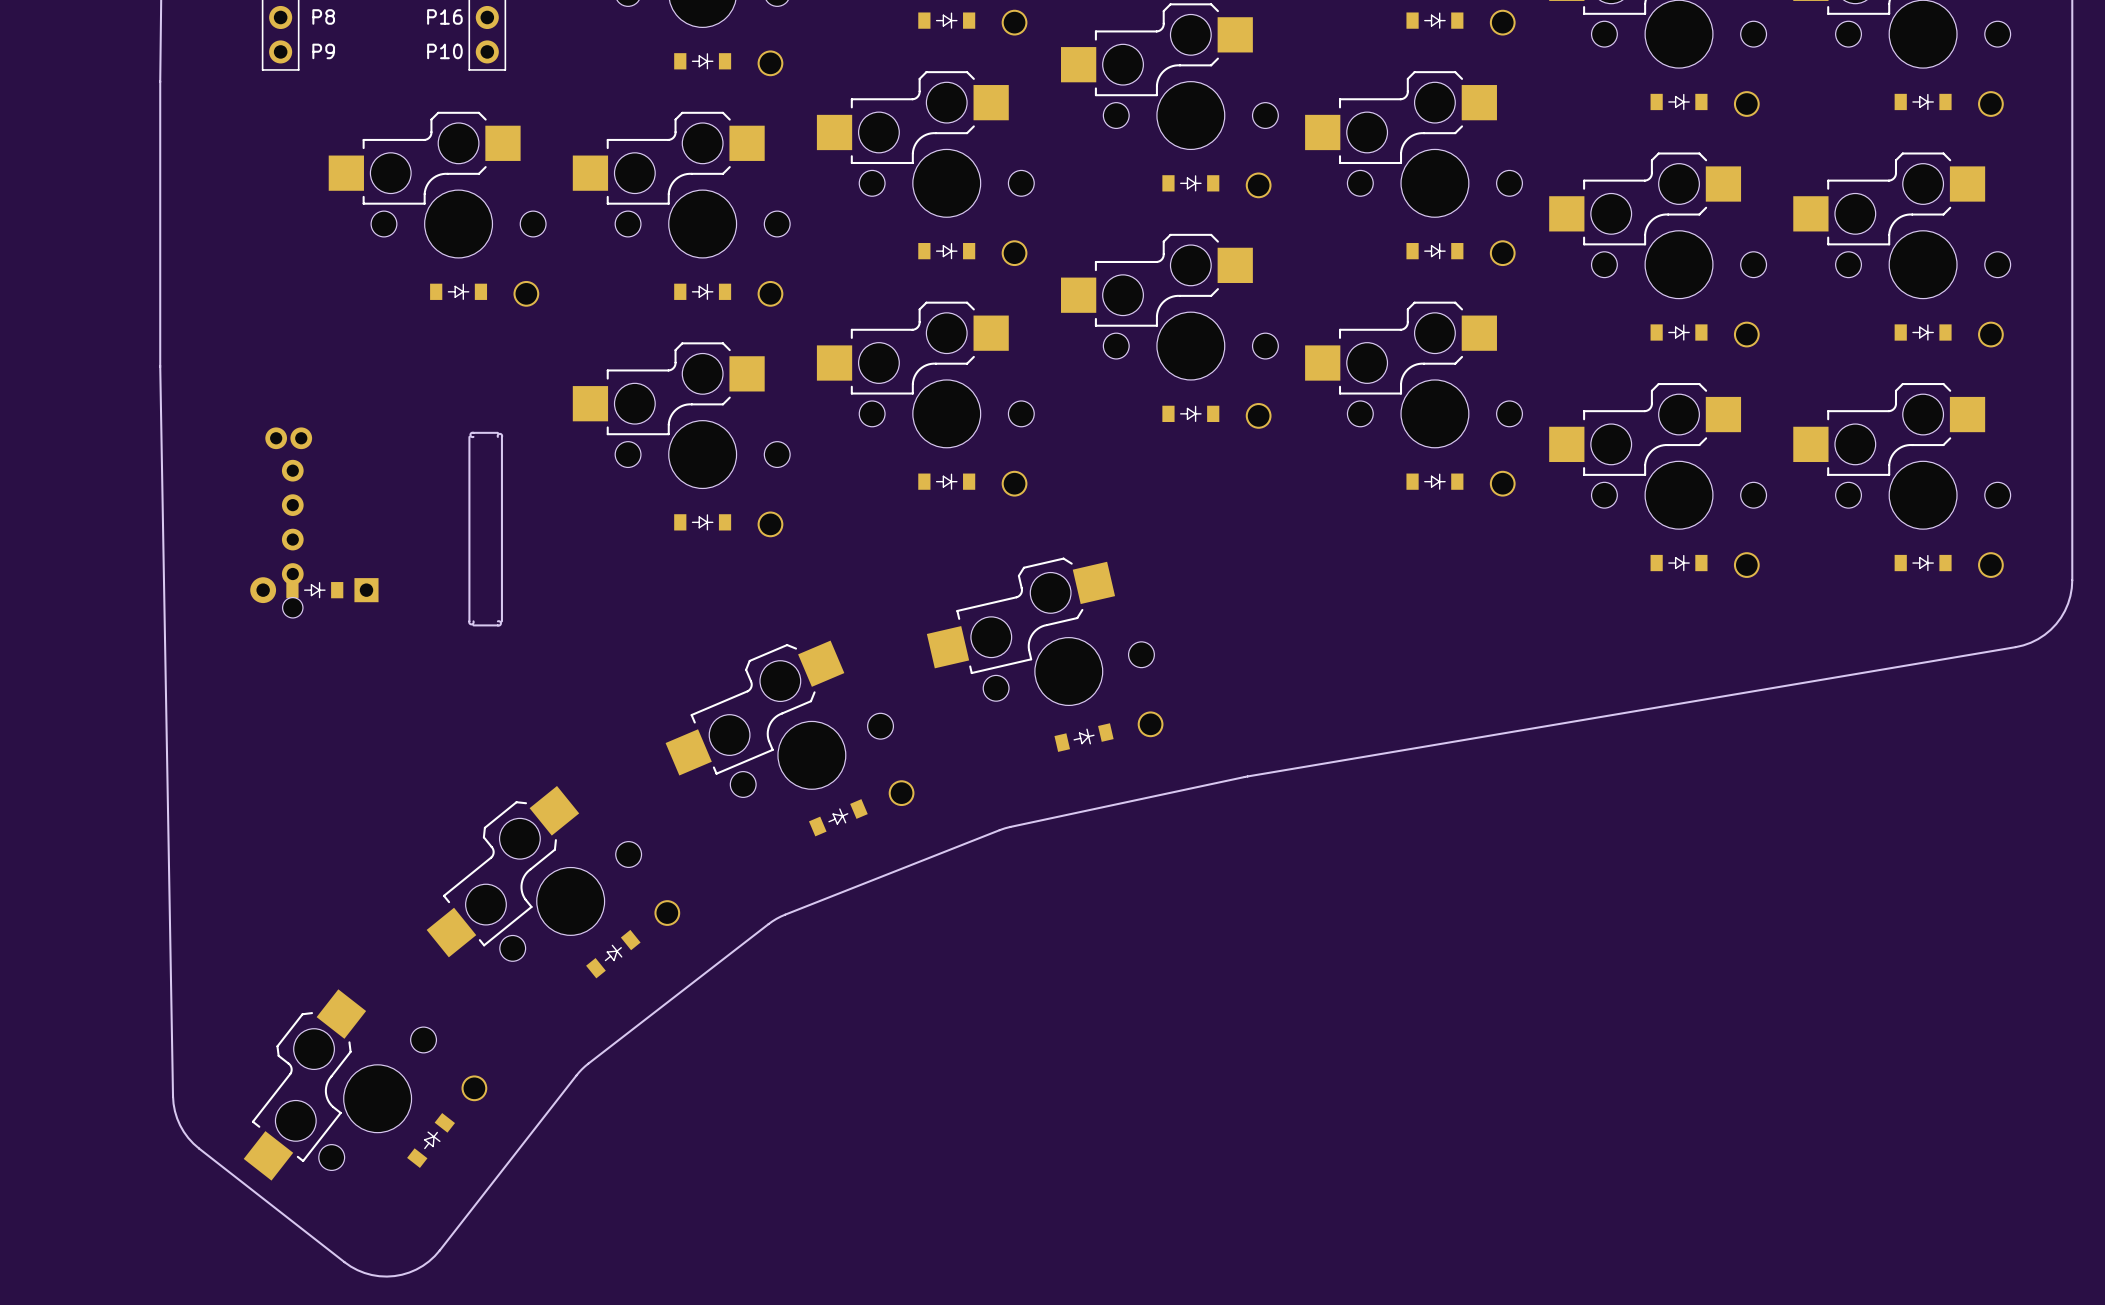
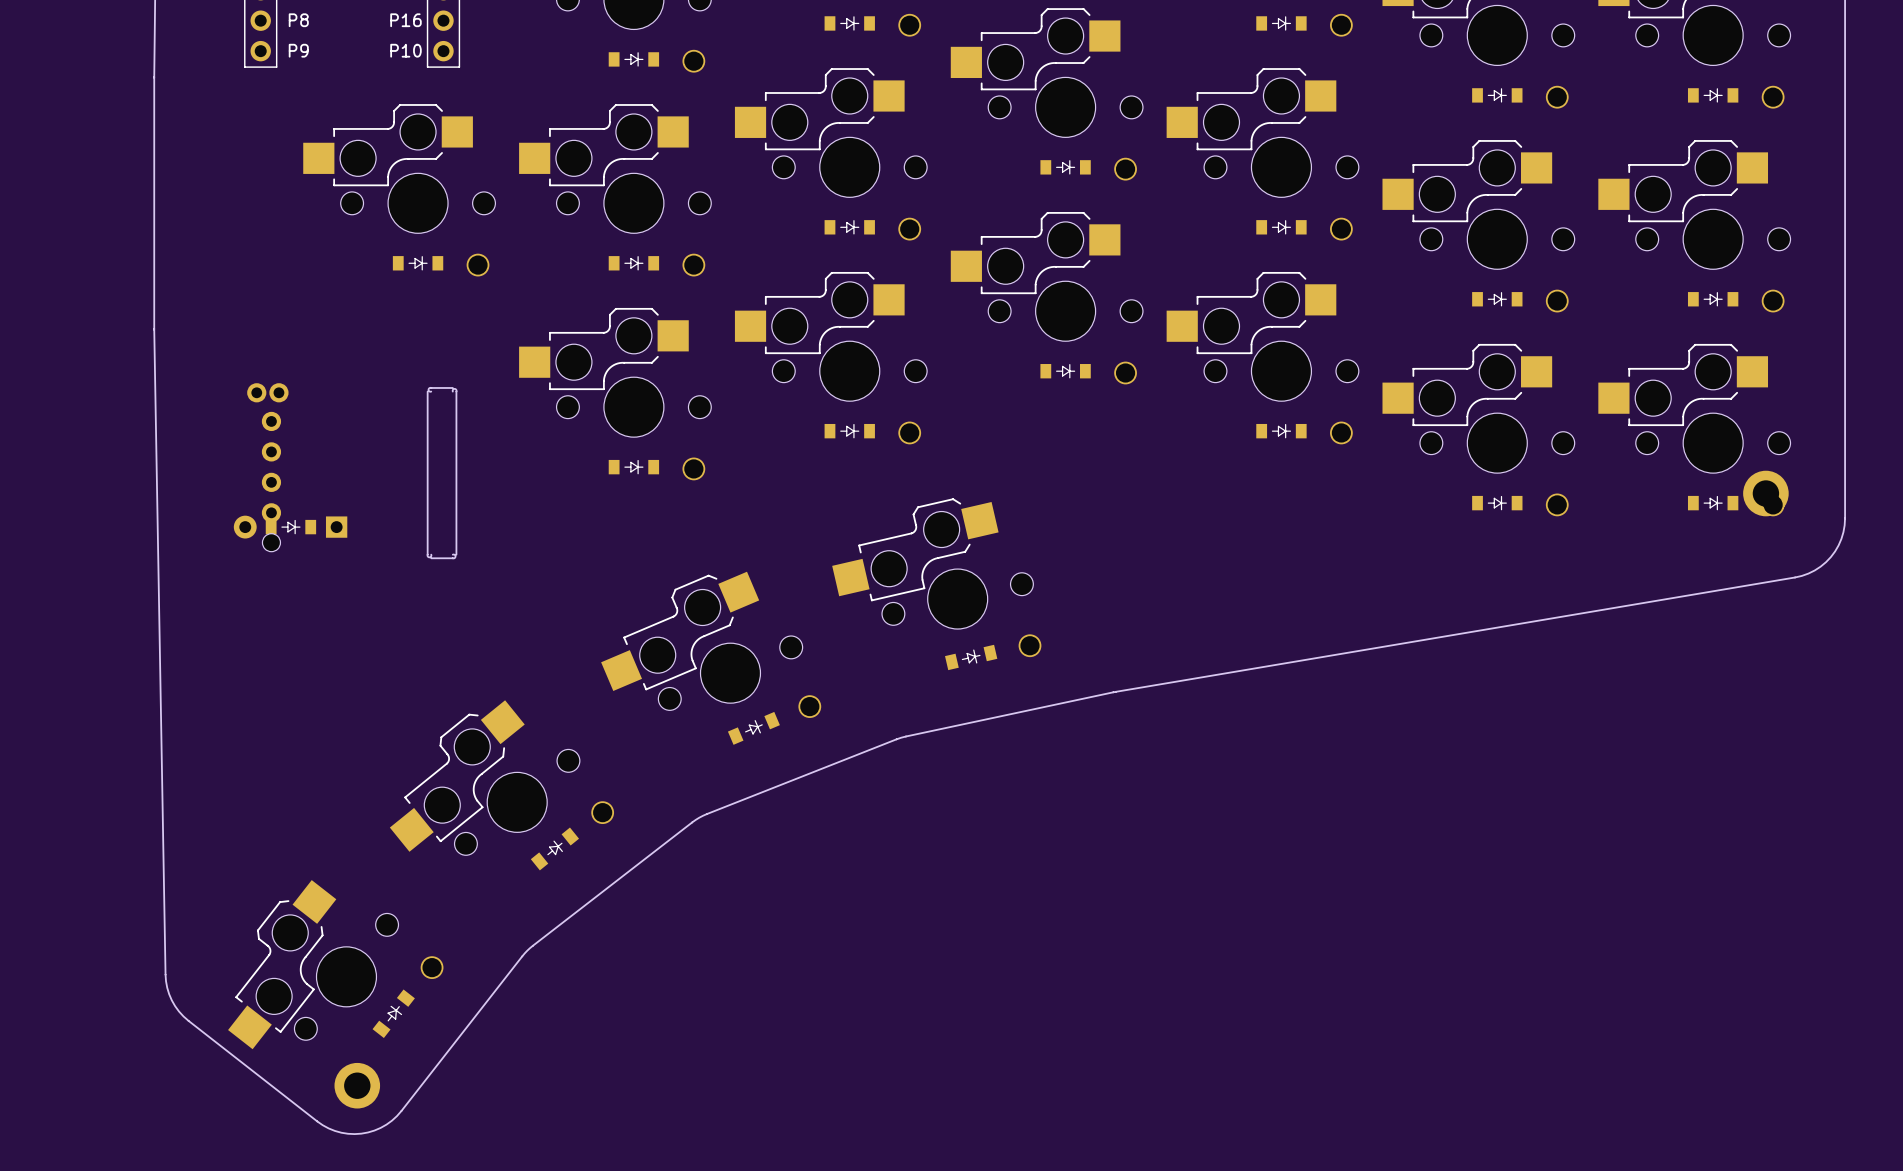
part: none -> (1765, 493)
part: none -> (357, 1085)

